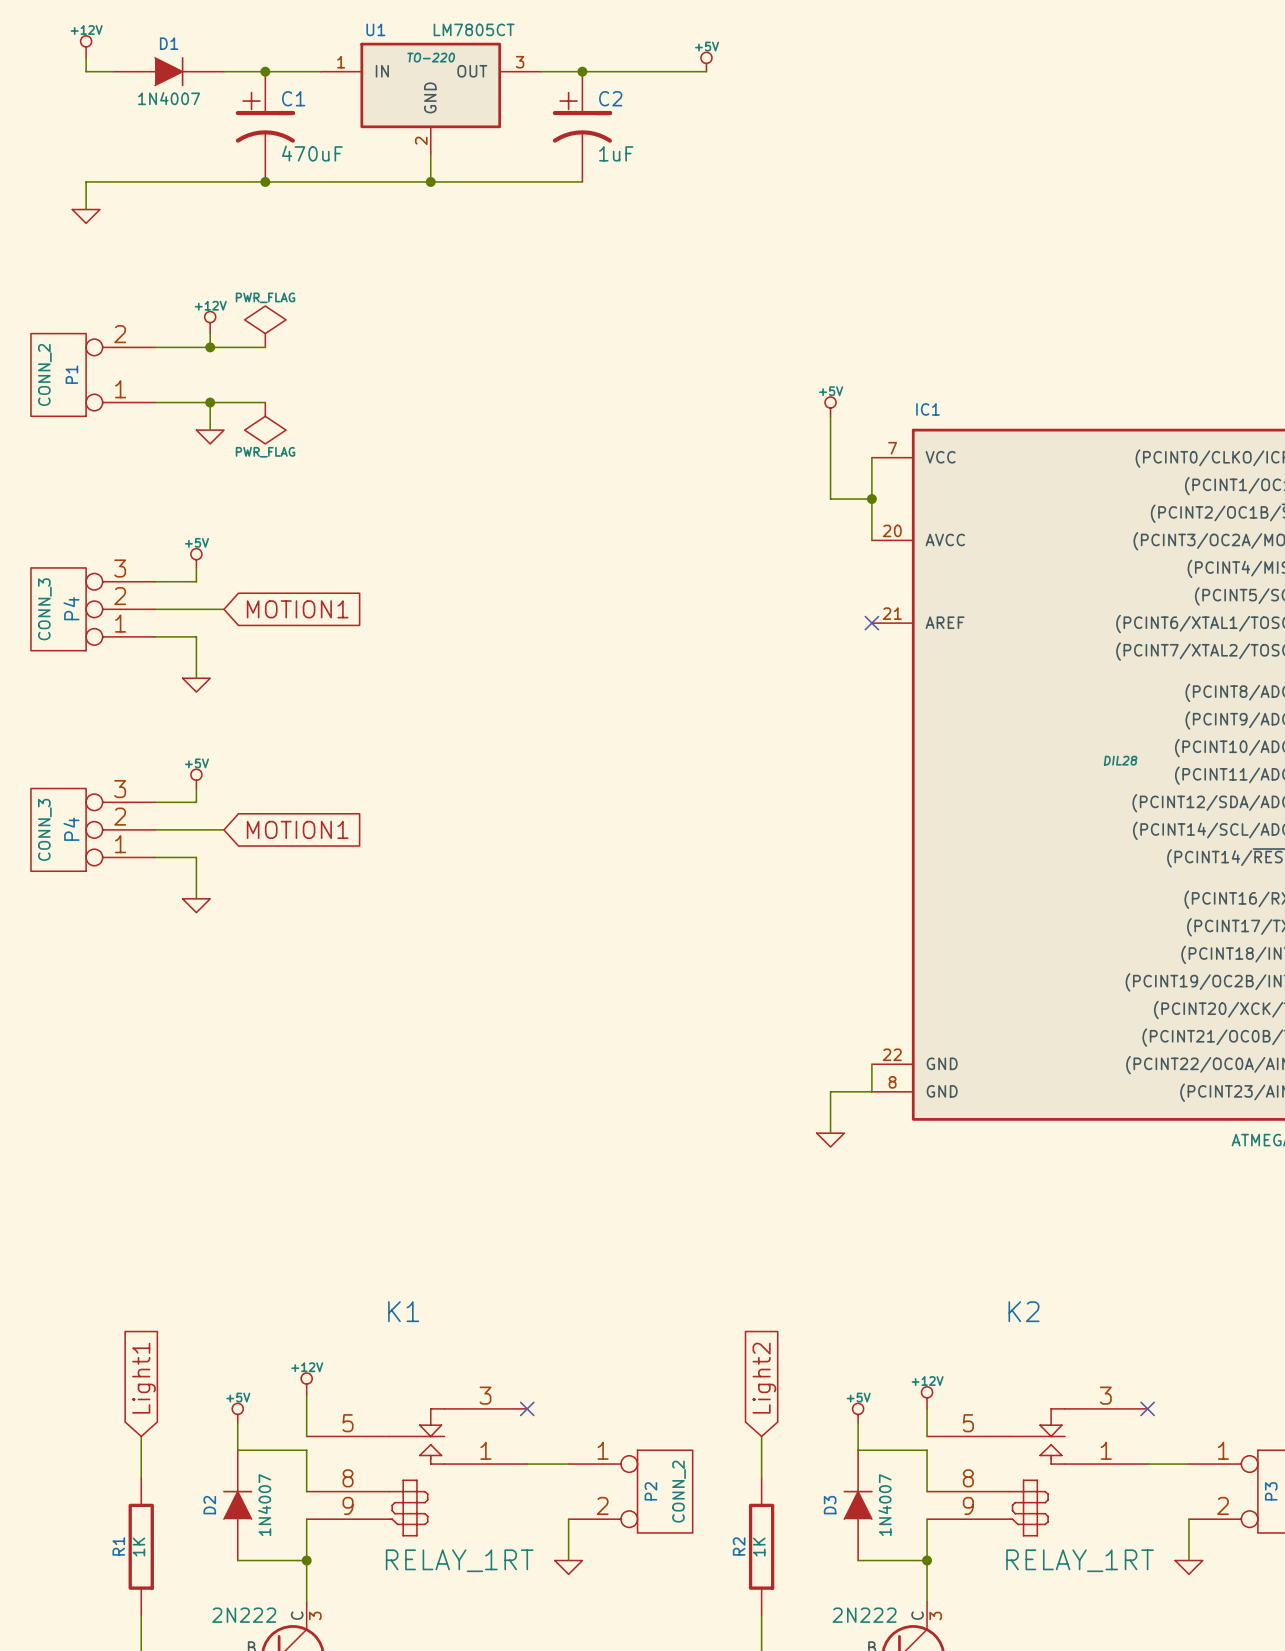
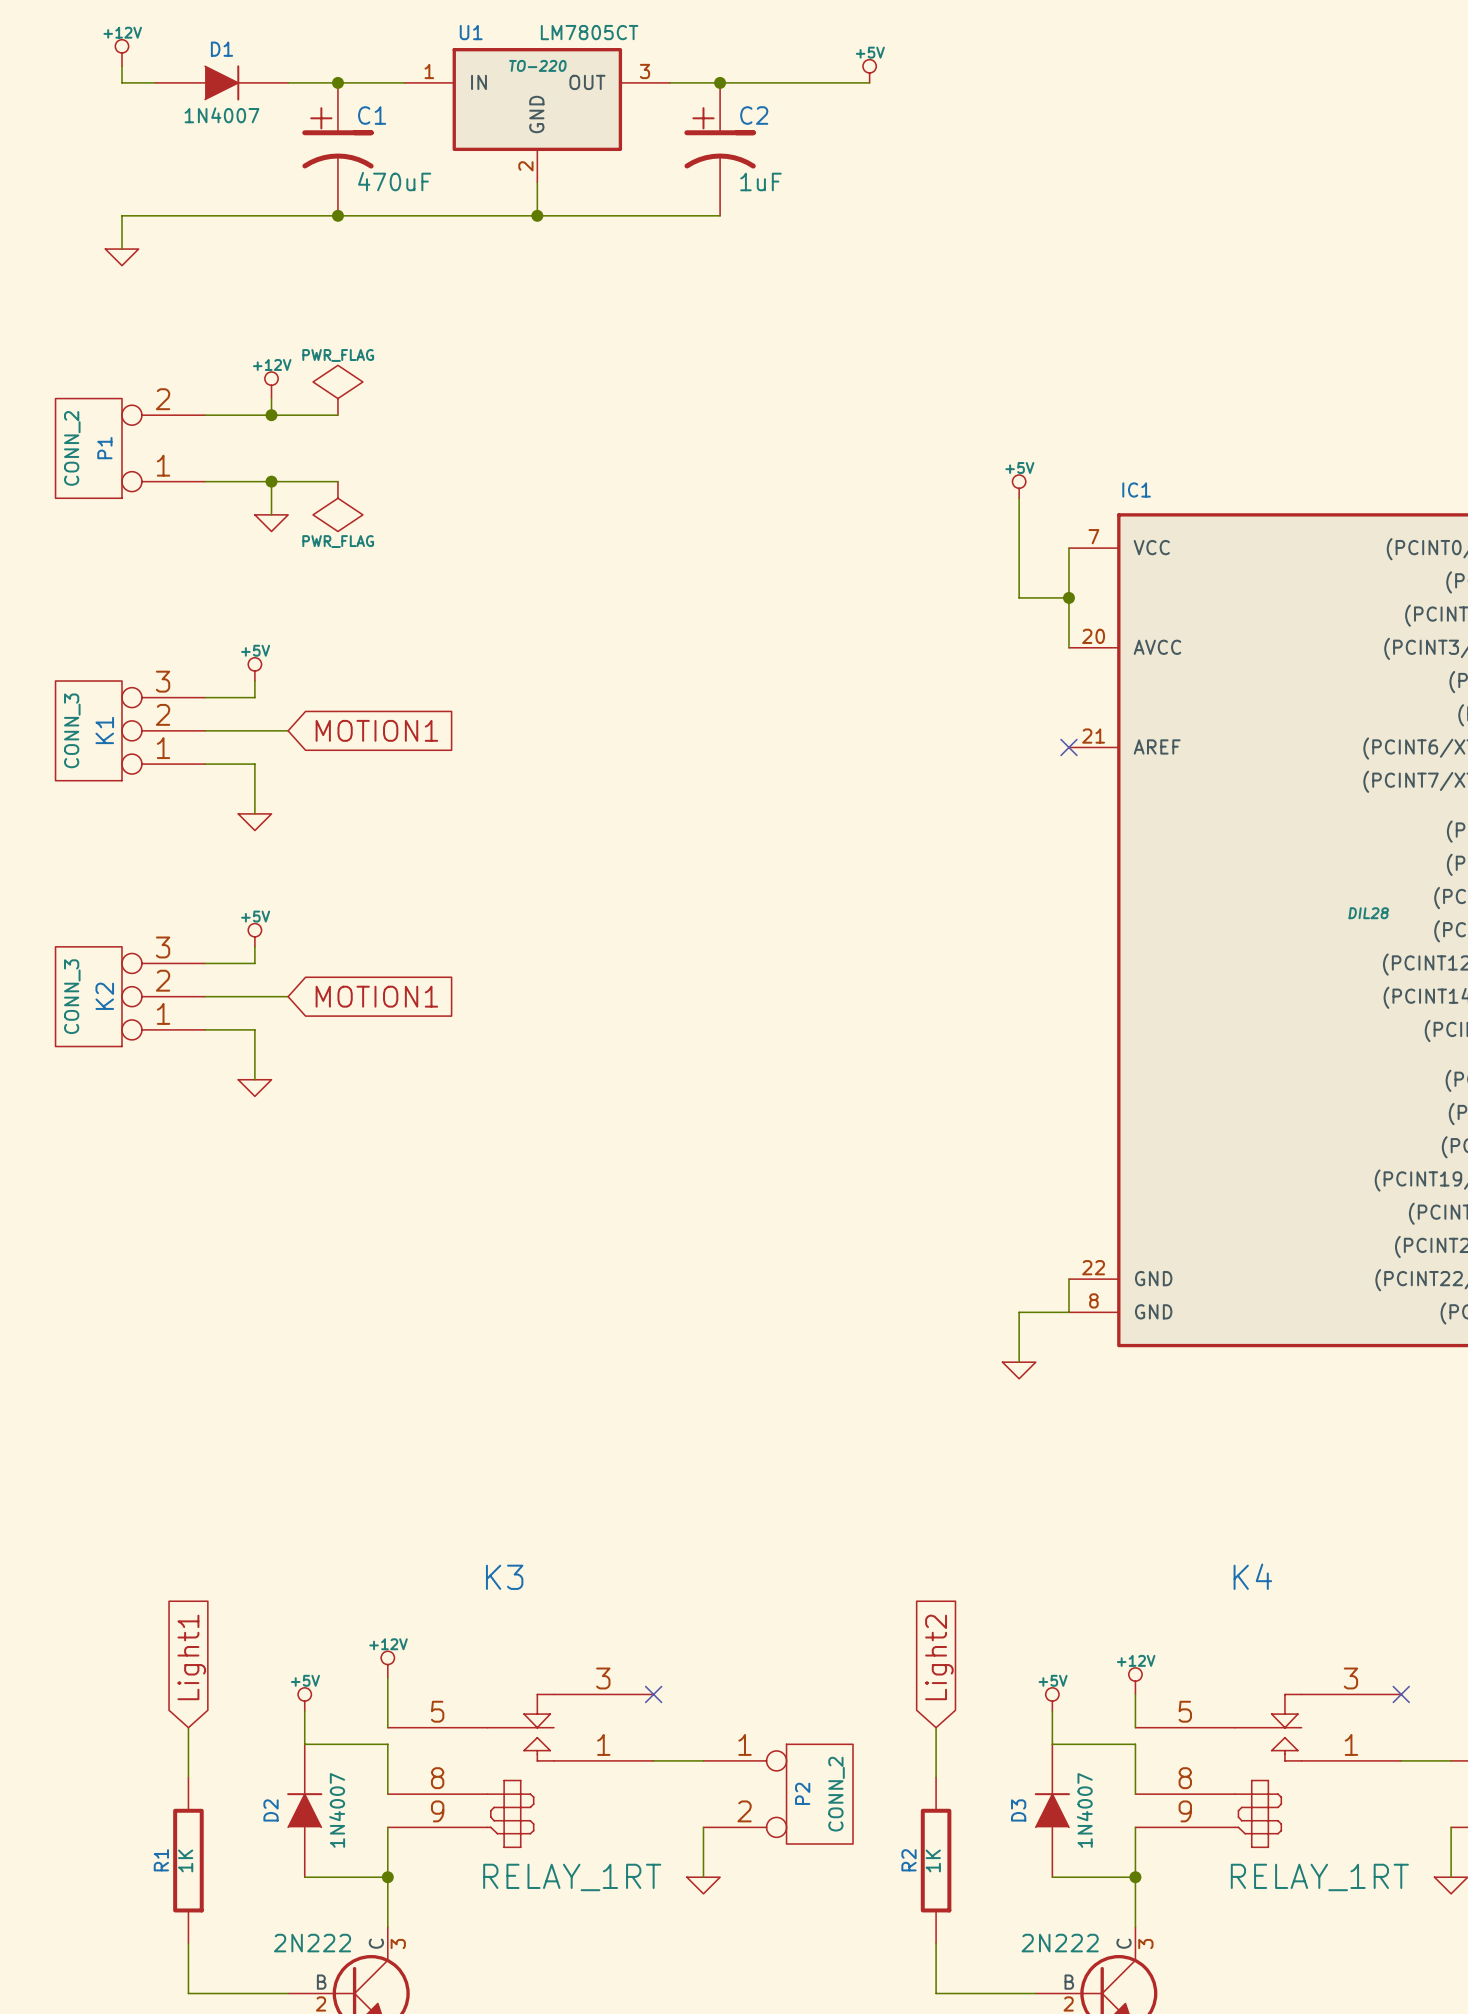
P4 name: P4 (71, 608) -> K1 (104, 730)
P4 name: P4 (71, 829) -> K2 (104, 996)
K1 name: K1 (403, 1311) -> K3 (504, 1577)
K2 name: K2 (1024, 1311) -> K4 (1252, 1576)

